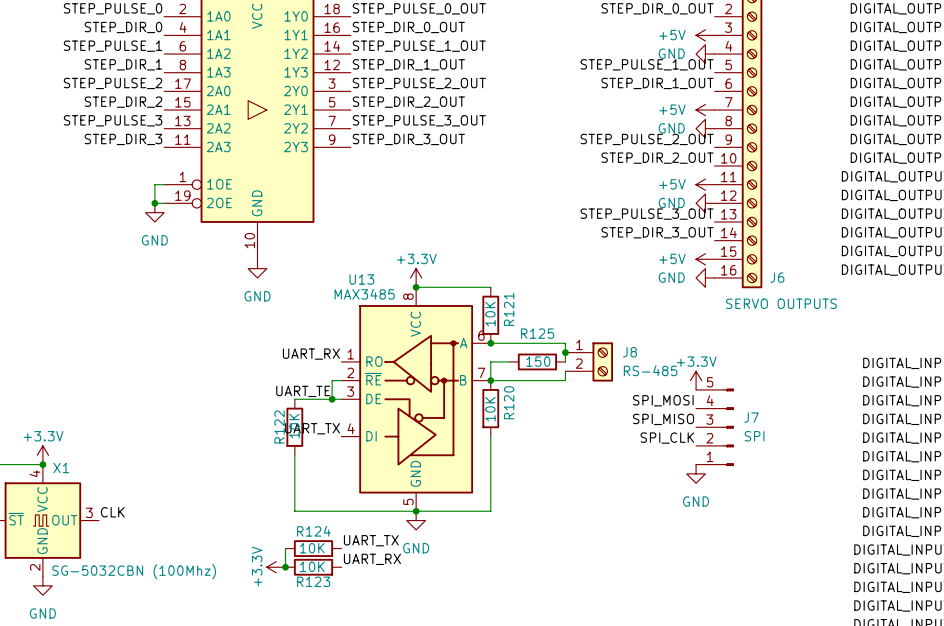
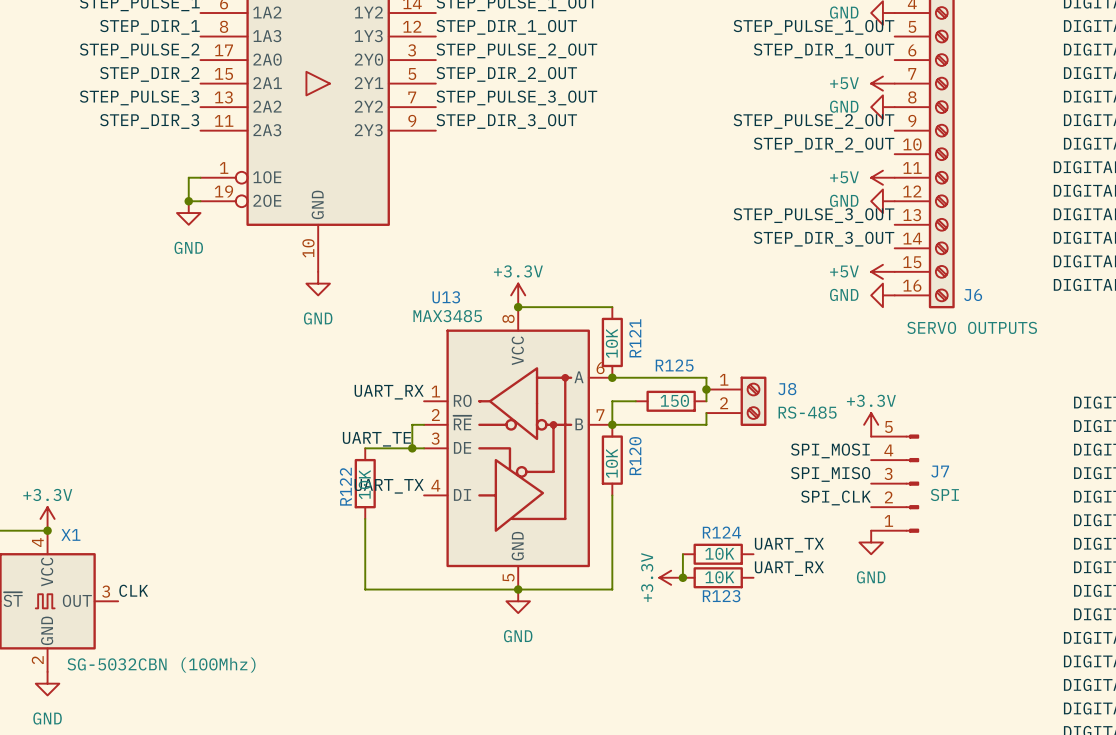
label: none -> UART_TX (789, 545)
wire: none -> (682, 554) (682, 577)
label: none -> UART_RX (789, 568)
power symbol: none -> +3.3V (671, 577)
junction: none -> (682, 577)
label: UART_TX (371, 540) -> none
wire: (285, 548) (285, 567) -> none
R124 position: (313, 548) -> (718, 554)
label: UART_RX (372, 559) -> none
power symbol: +3.3V (276, 567) -> none
junction: (285, 567) -> none
R123 position: (313, 567) -> (718, 577)

